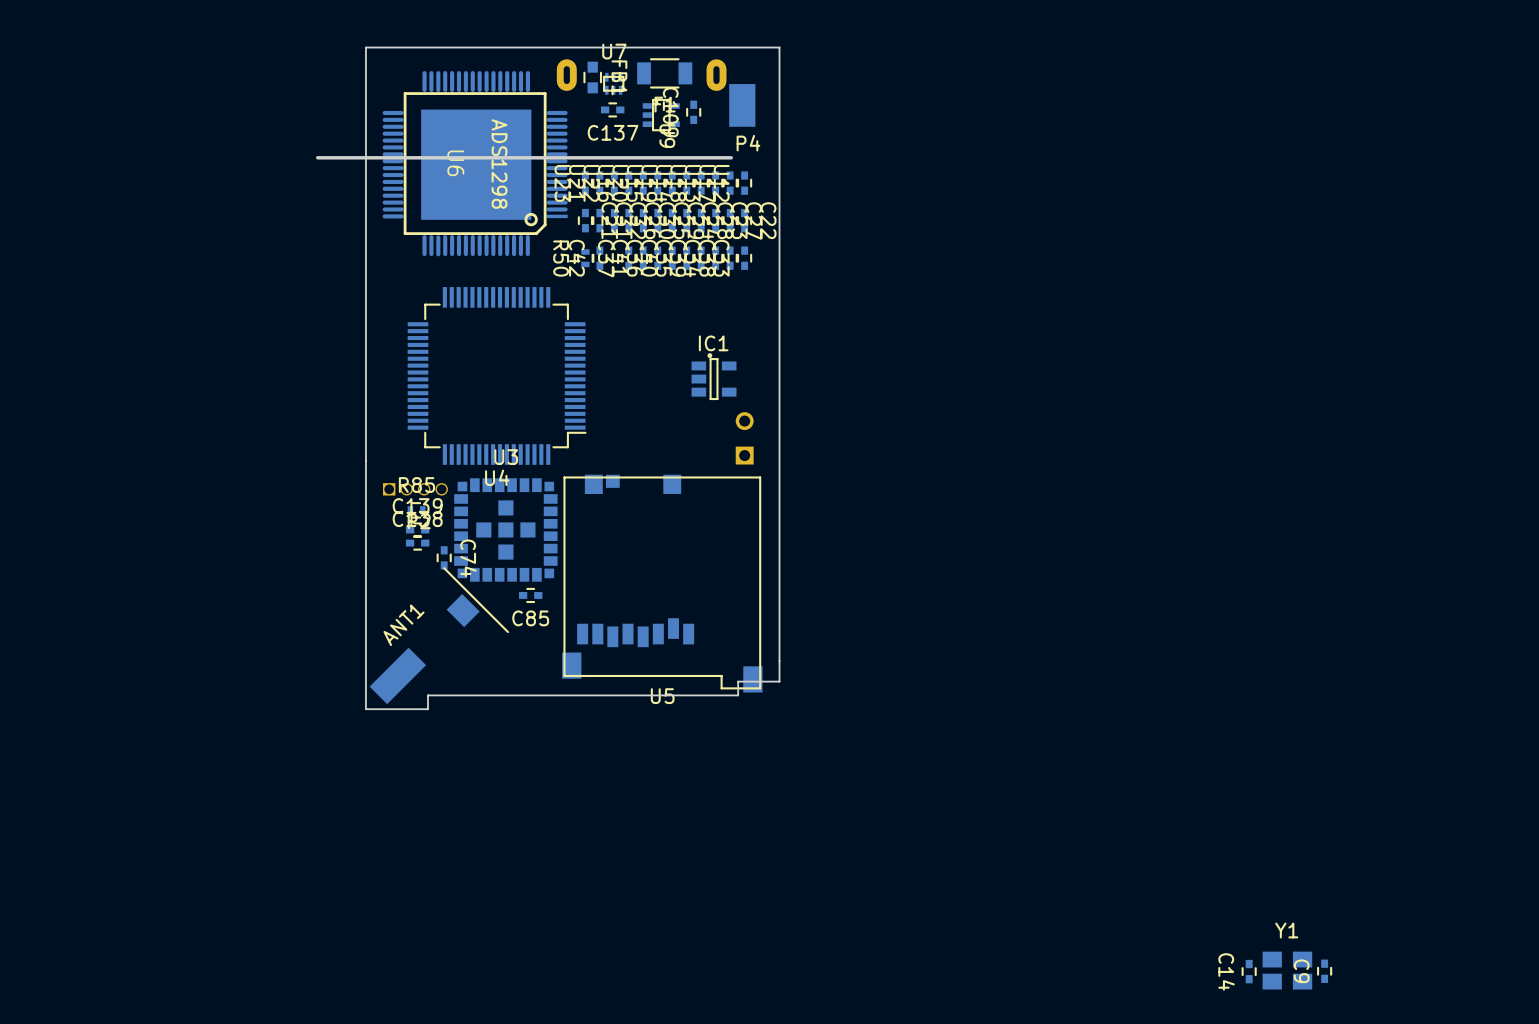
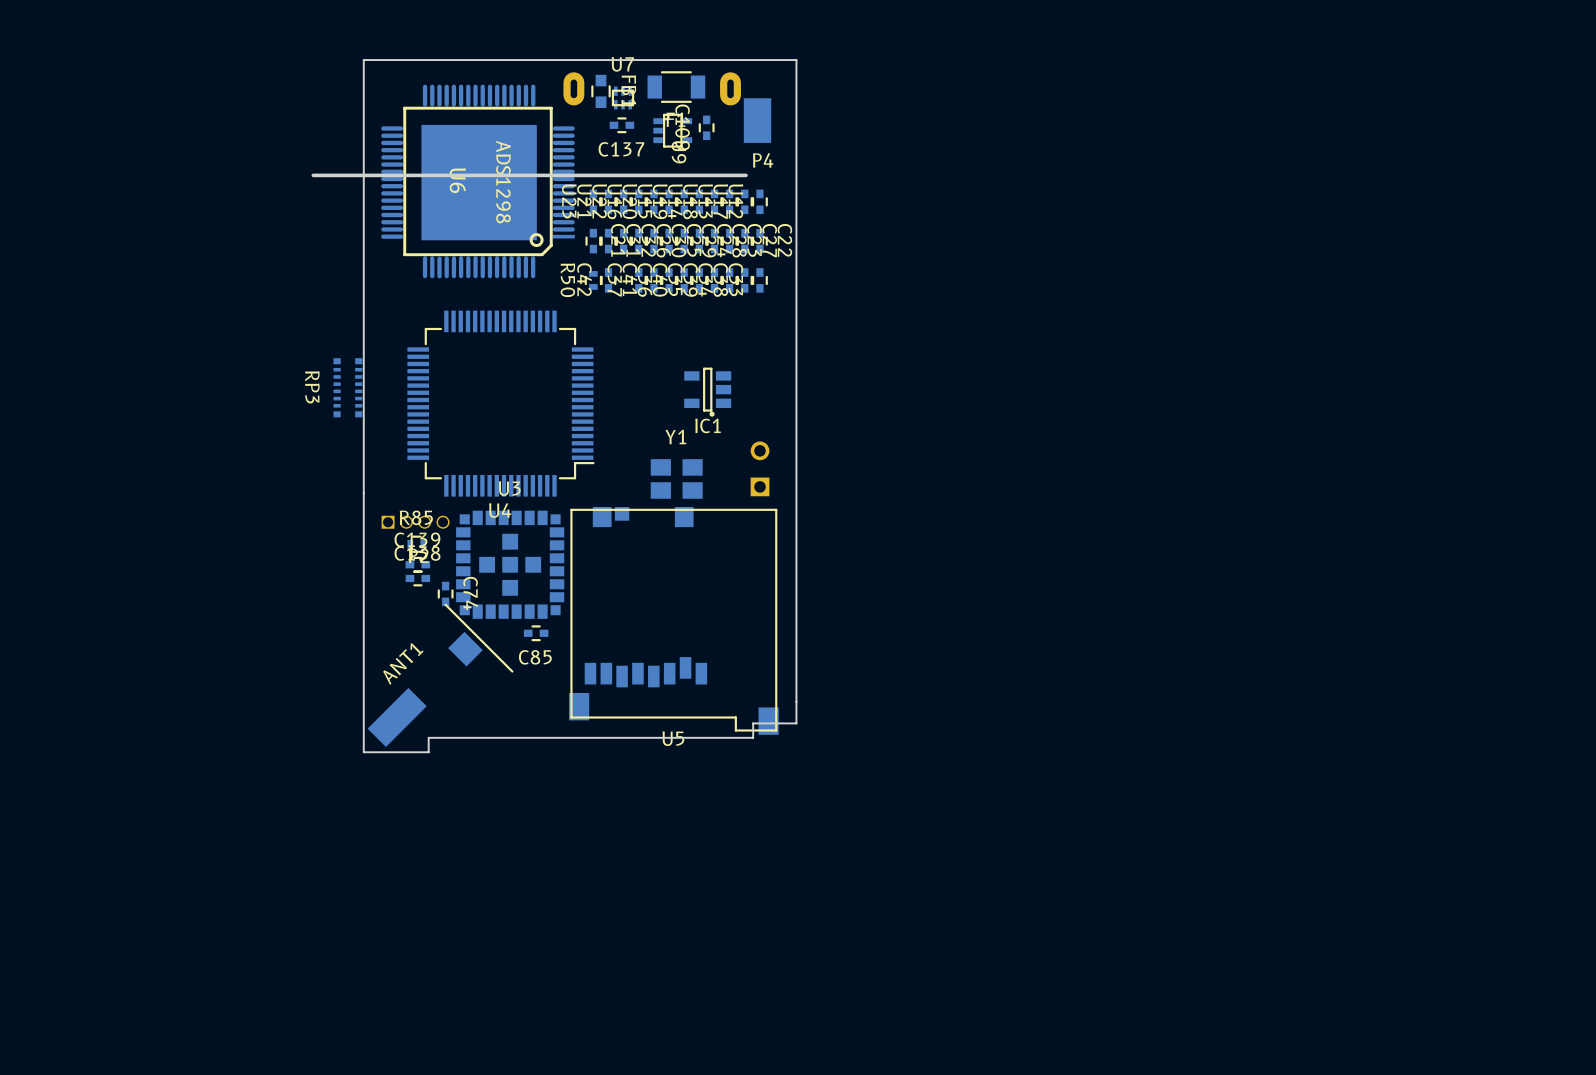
RP3: none -> (347, 387)
IC1 rotation: 0° (714, 376) -> 180° (707, 392)
Y1 position: (1287, 970) -> (676, 478)
C14: (1249, 971) -> none
C9: (1324, 971) -> none

